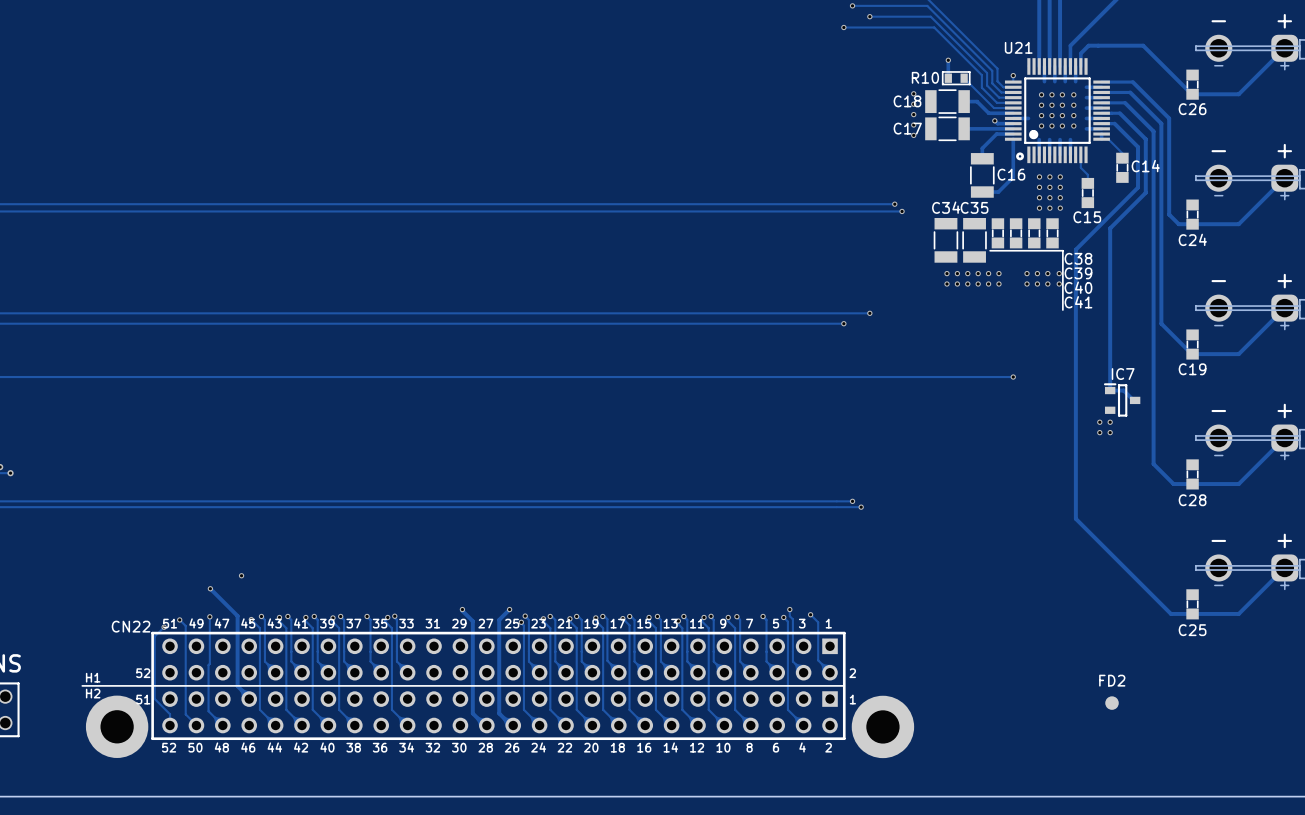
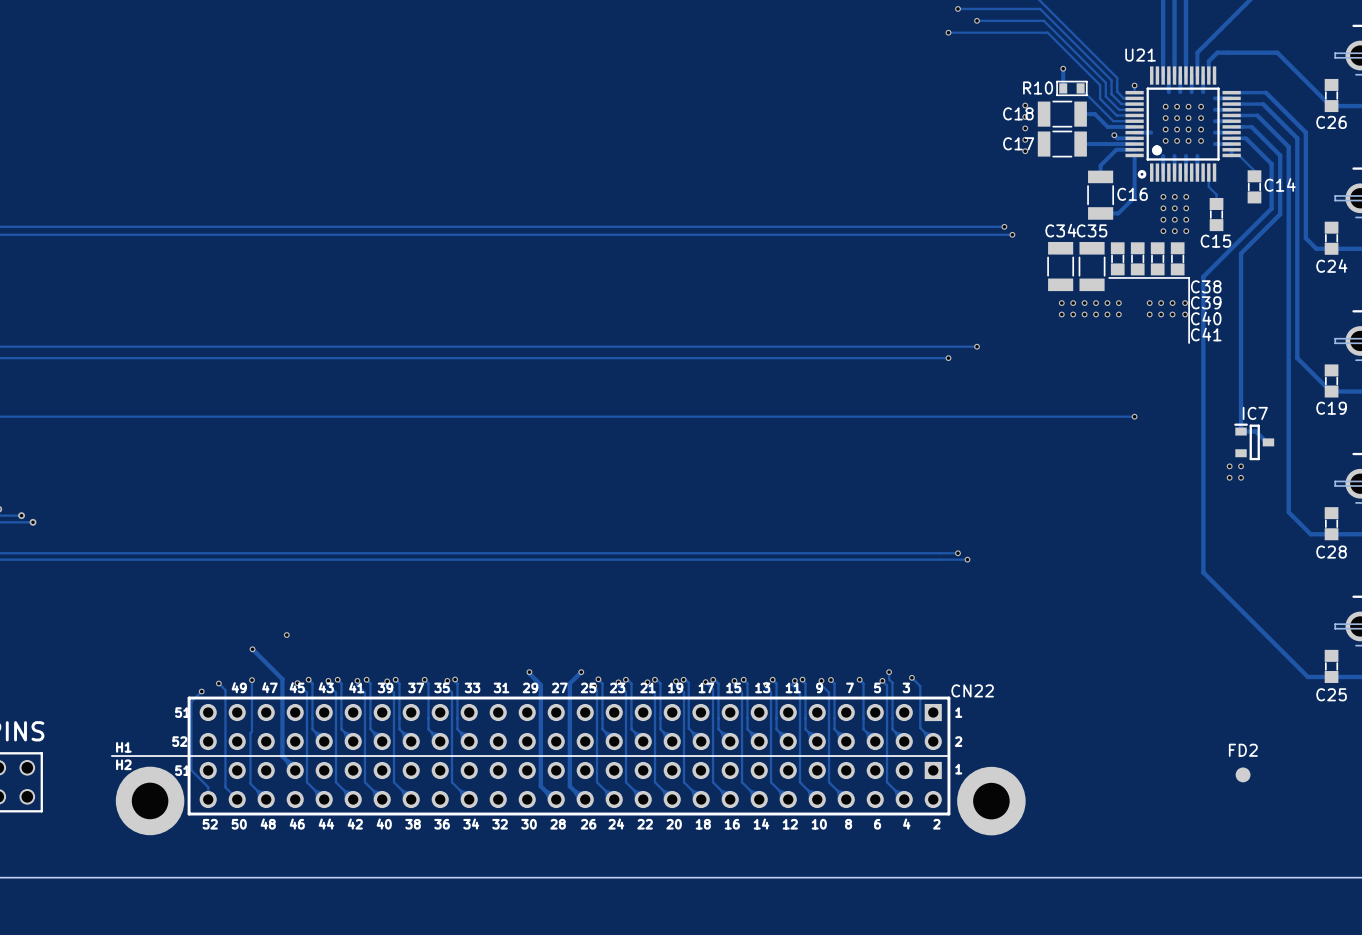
CN22 name position: CN22 (131, 626) -> CN22 (972, 690)
CN22 footprint: [81, 631, 915, 759] -> [111, 696, 1026, 836]

